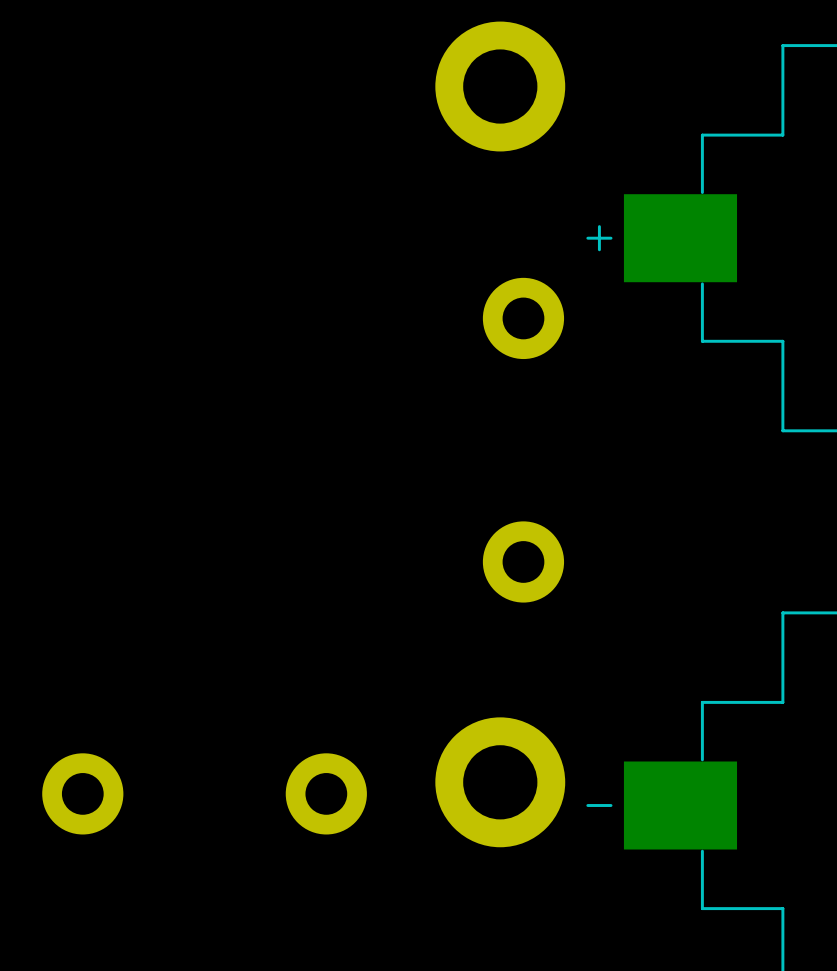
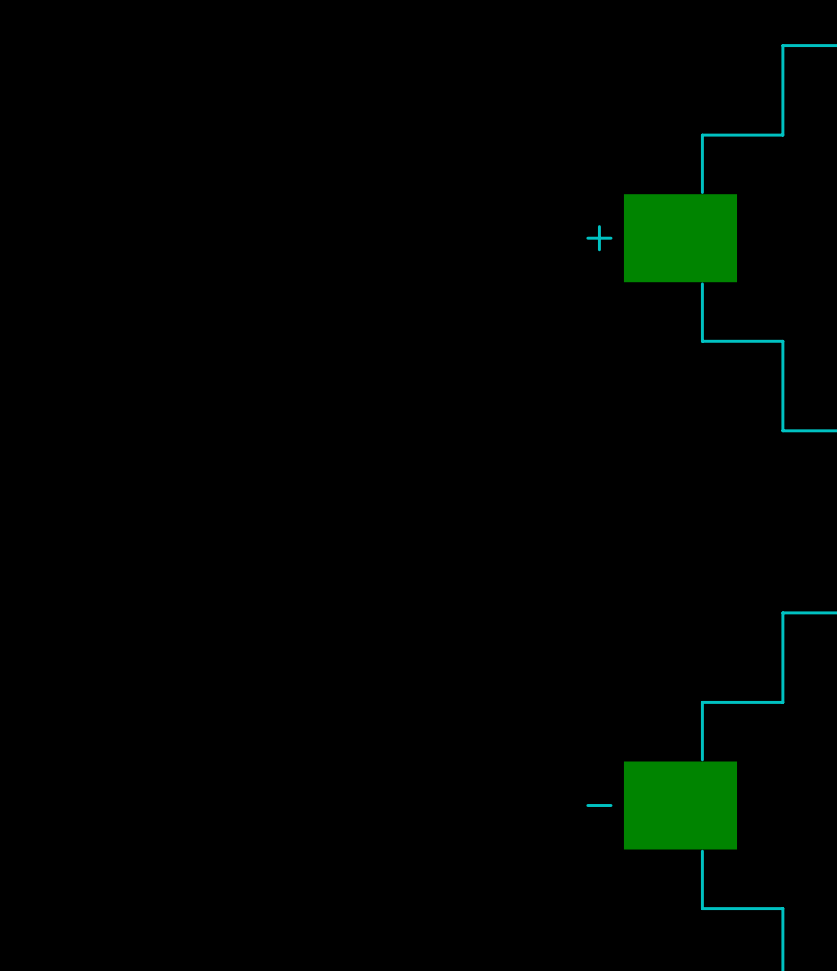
part: (500, 86) -> none
part: (523, 318) -> none
part: (523, 561) -> none
part: (500, 782) -> none
part: (82, 793) -> none
part: (326, 793) -> none

